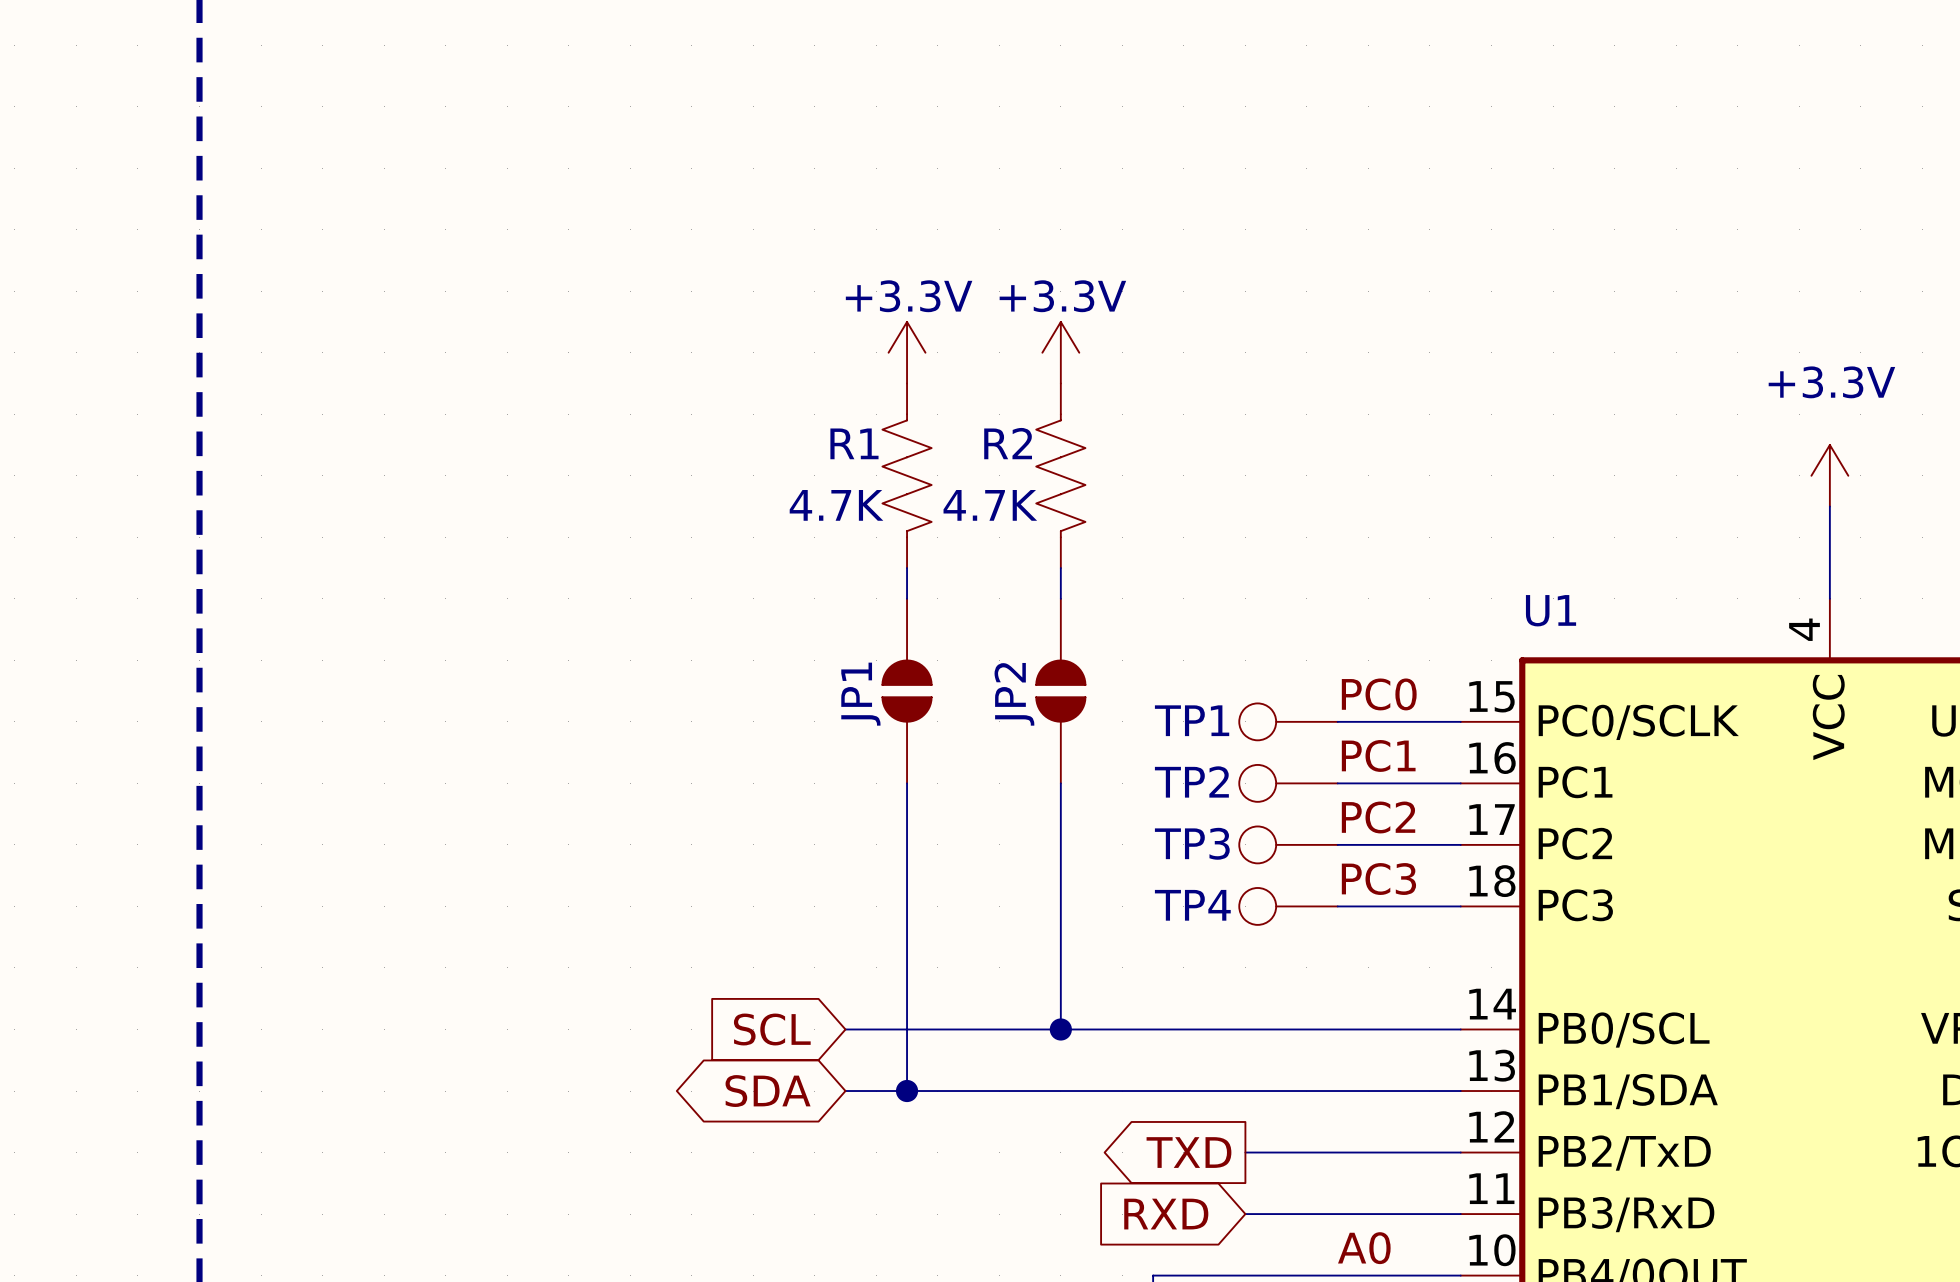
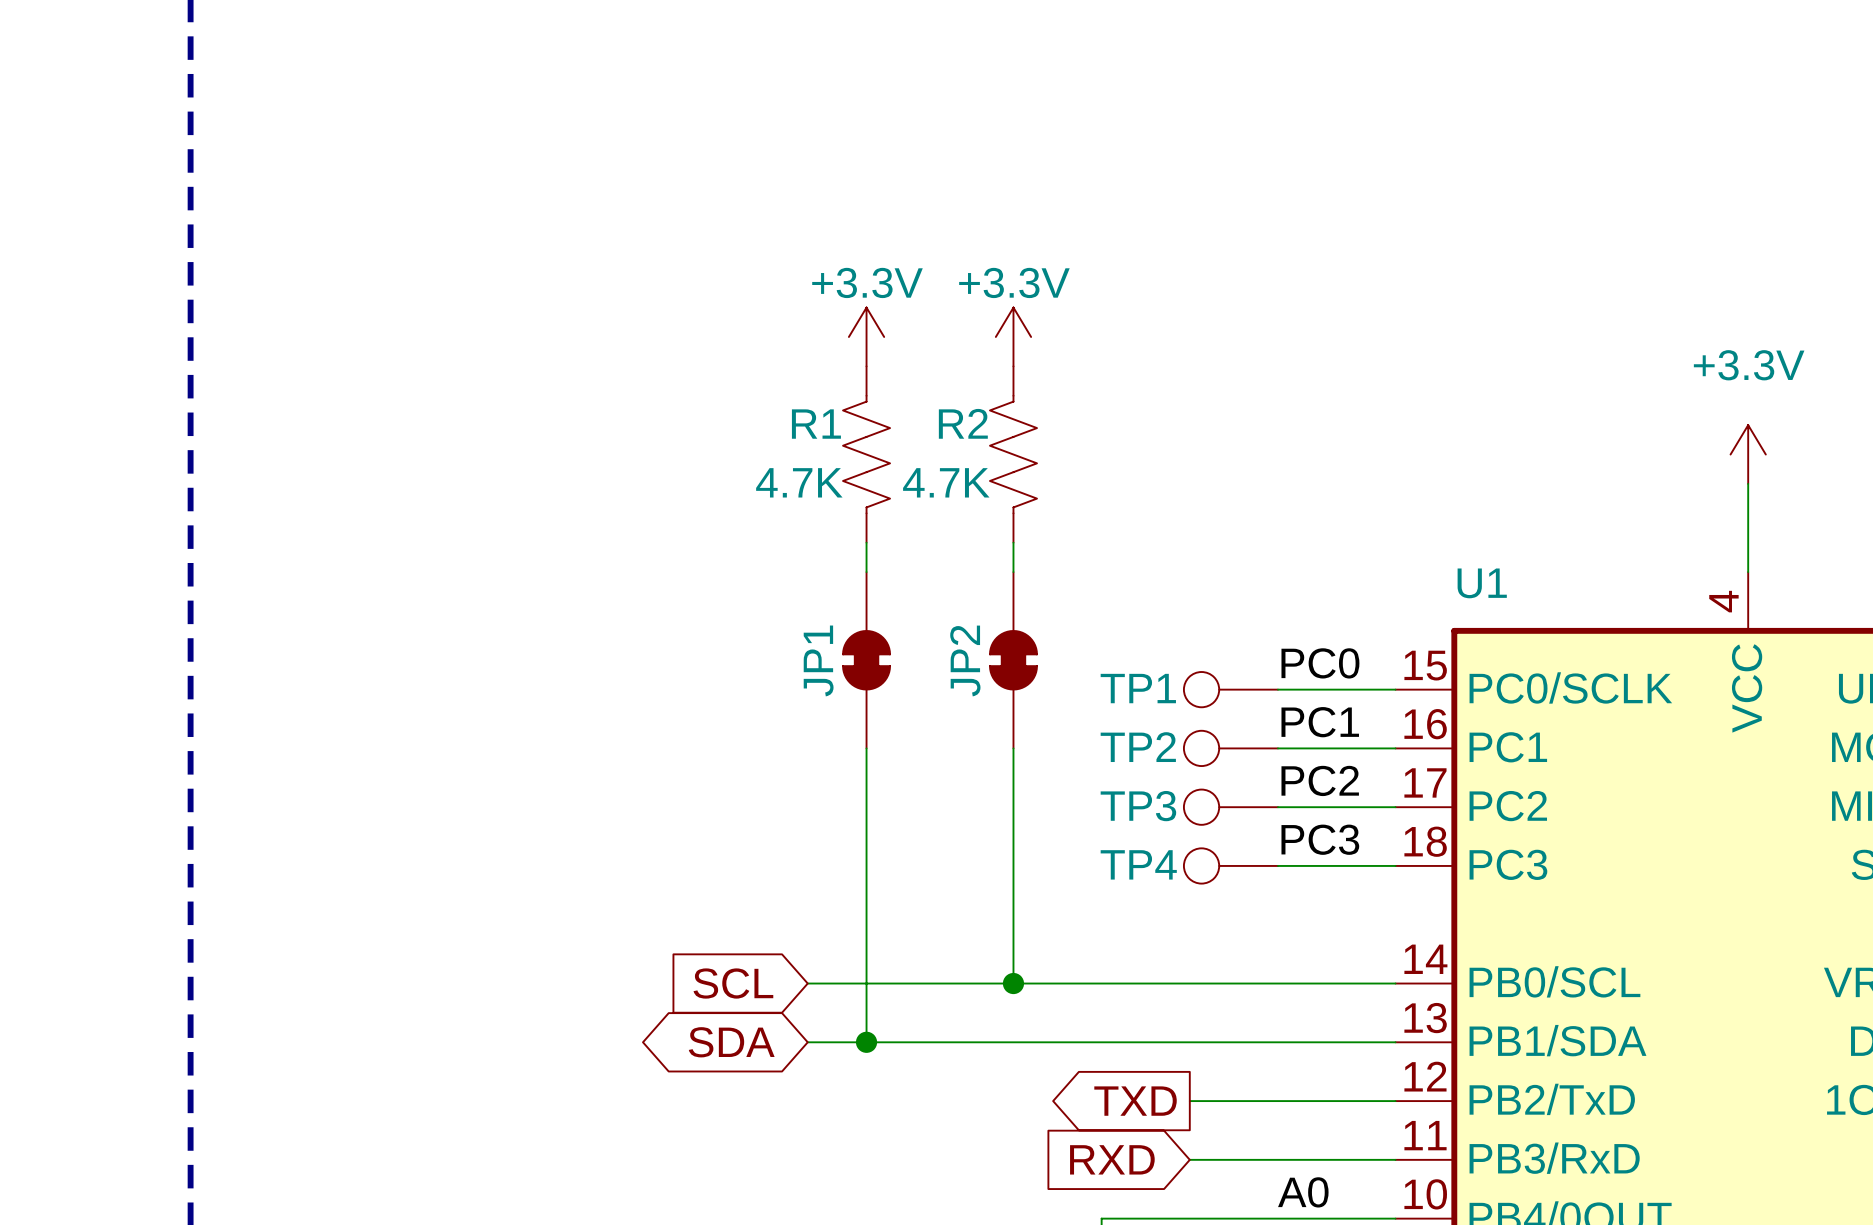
JP1 symbol: [882, 598, 932, 784] -> [843, 572, 891, 749]
JP2 symbol: [1036, 598, 1086, 784] -> [989, 572, 1037, 749]

